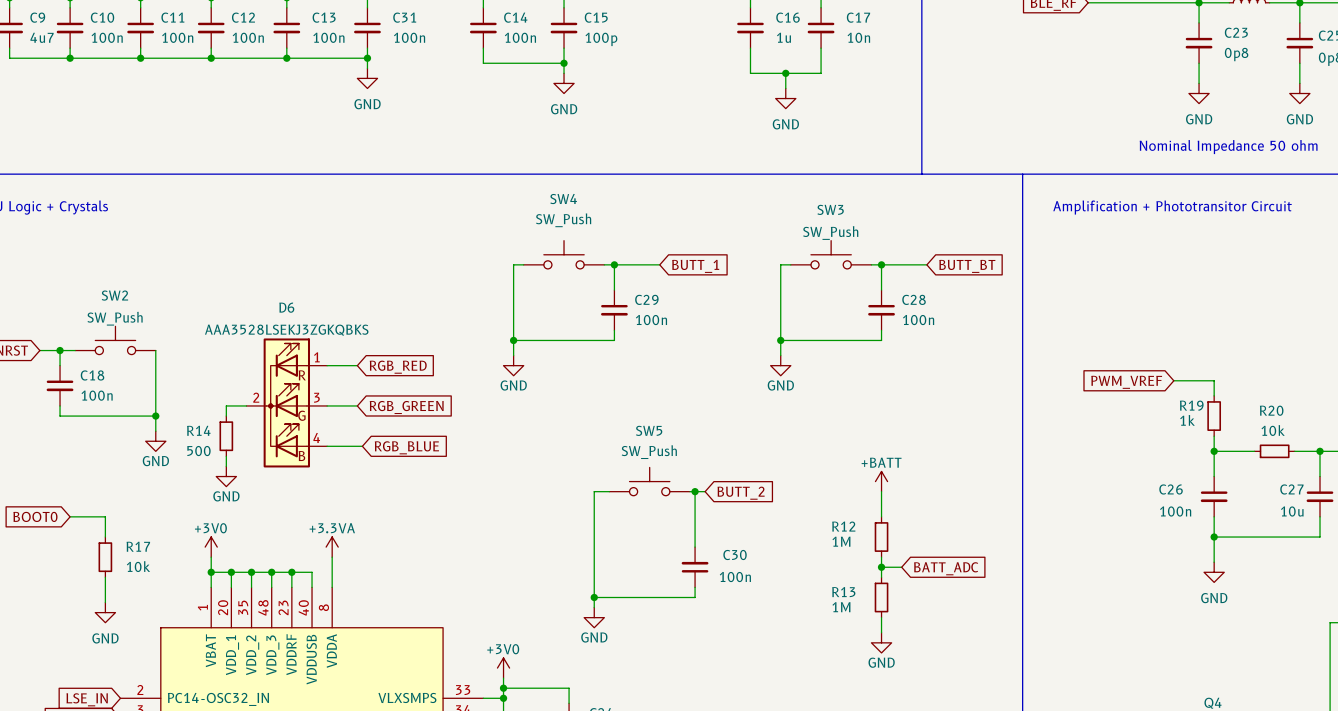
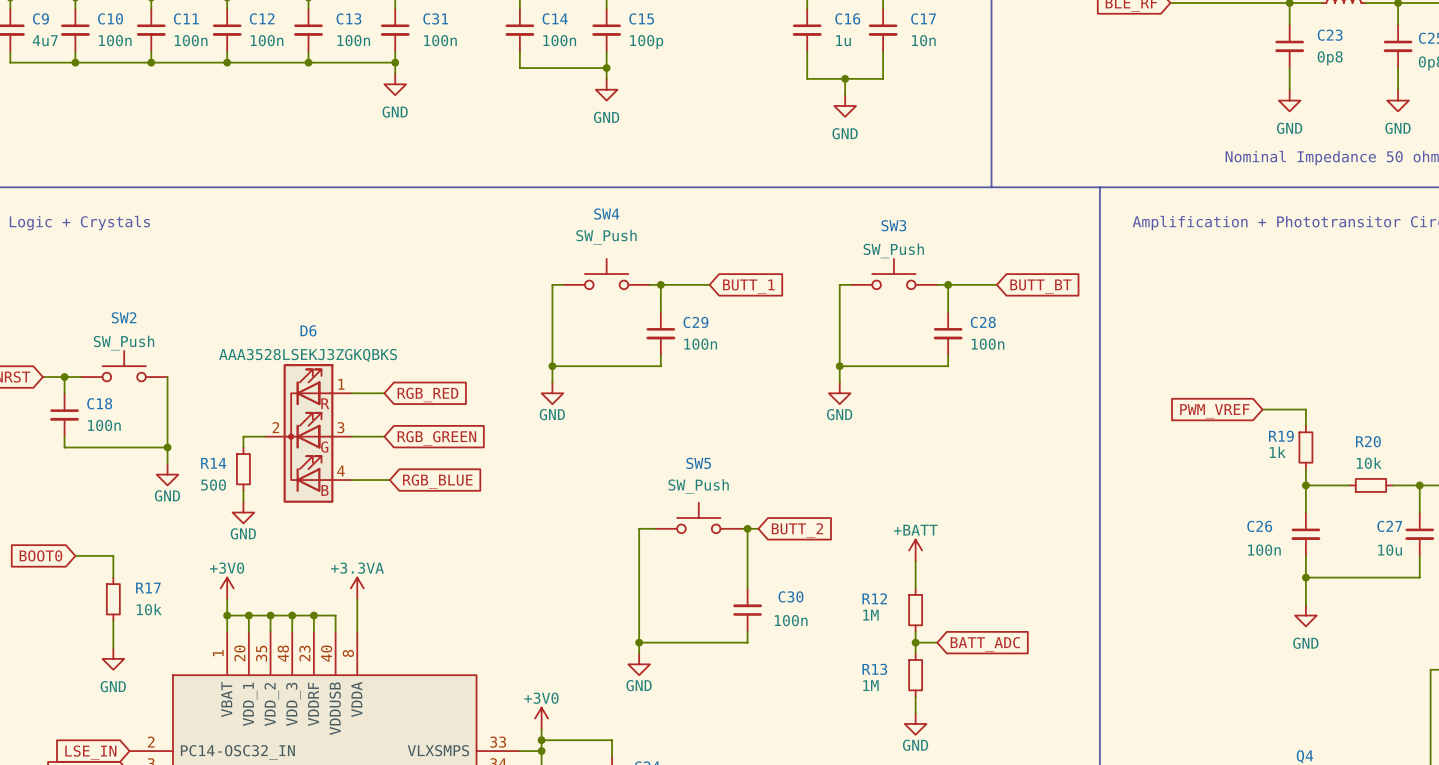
power symbol position: +BATT (881, 481) -> +BATT (915, 550)
wire: (881, 491) (881, 516) -> (915, 561) (915, 588)
R12 position: (881, 537) -> (915, 610)
wire: (881, 557) (881, 577) -> (915, 631) (915, 653)
wire: (881, 567) (901, 567) -> (915, 642) (937, 642)
junction position: (881, 567) -> (915, 642)
global label position: BATT_ADC (946, 568) -> BATT_ADC (985, 644)
R13 position: (881, 597) -> (915, 675)
wire: (881, 617) (881, 632) -> (915, 696) (915, 713)
power symbol position: GND (881, 642) -> GND (915, 723)

